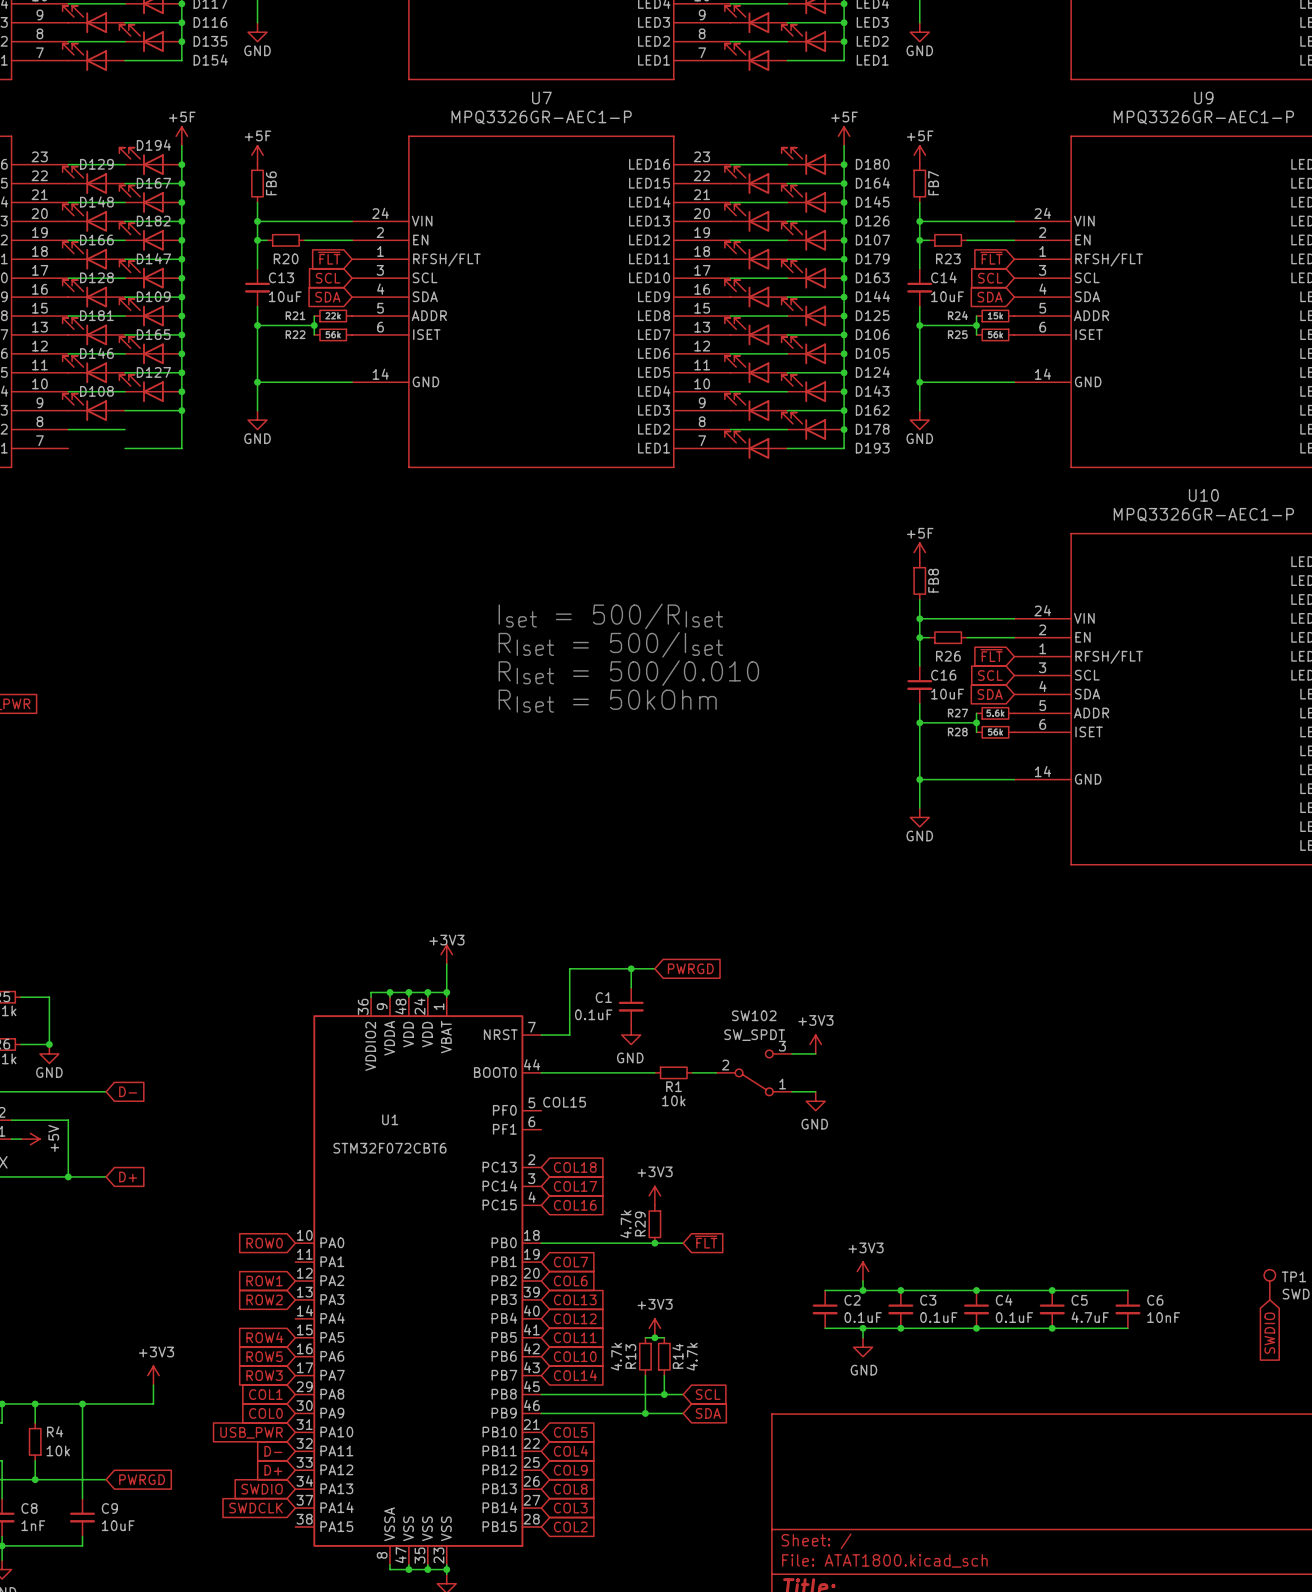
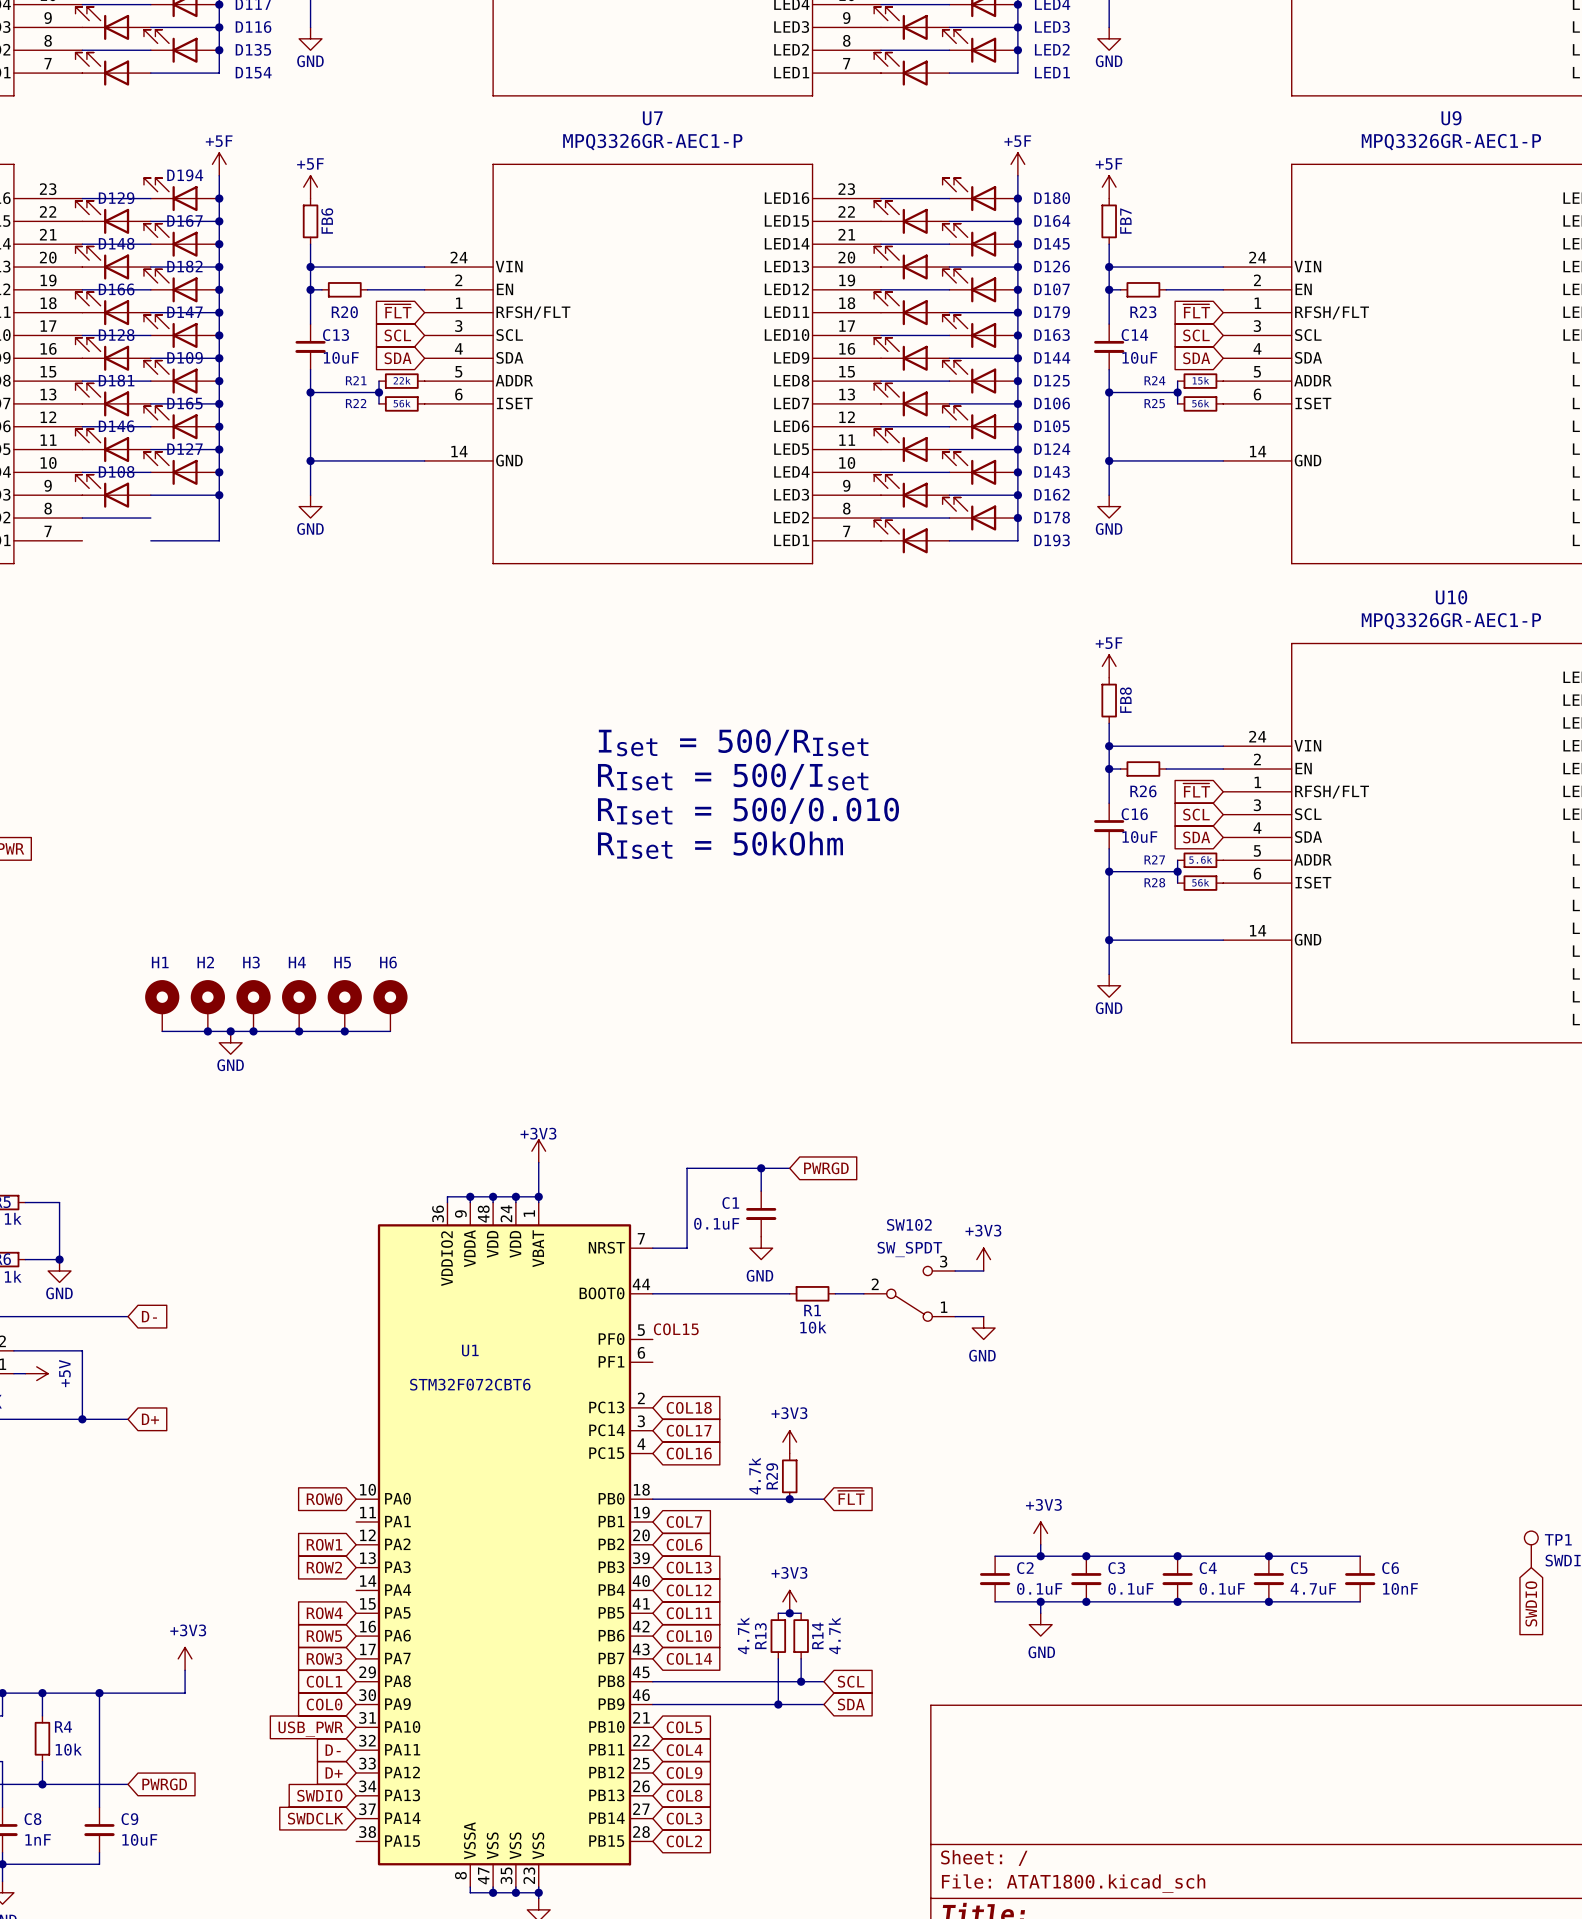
H1: none -> (162, 1005)
H2: none -> (207, 1005)
H3: none -> (253, 1005)
H4: none -> (299, 1005)
H5: none -> (344, 1005)
H6: none -> (390, 1005)
wire: none -> (162, 1031) (390, 1031)
junction: none -> (207, 1031)
junction: none -> (230, 1031)
junction: none -> (253, 1031)
junction: none -> (299, 1031)
junction: none -> (344, 1031)
power symbol: none -> GND (230, 1042)

